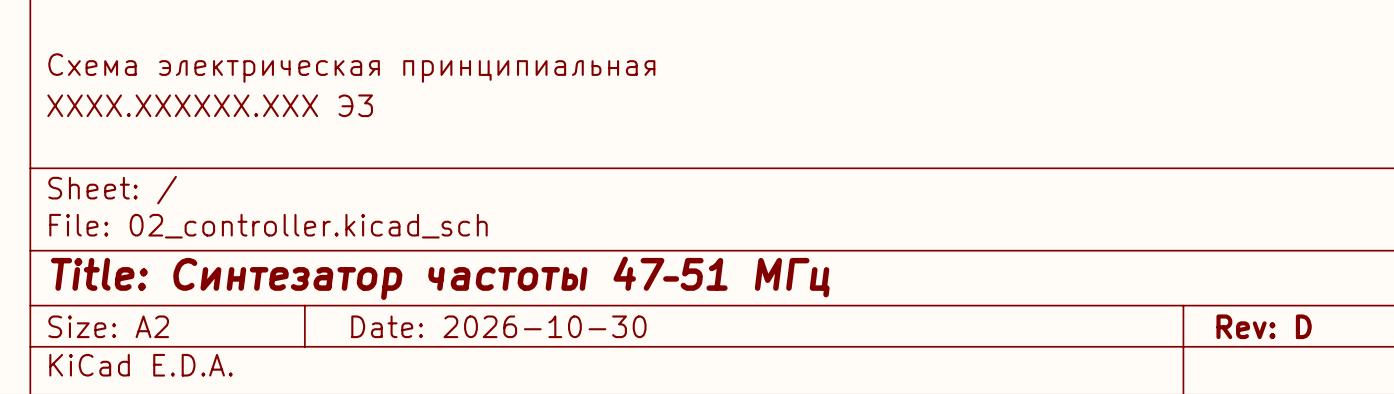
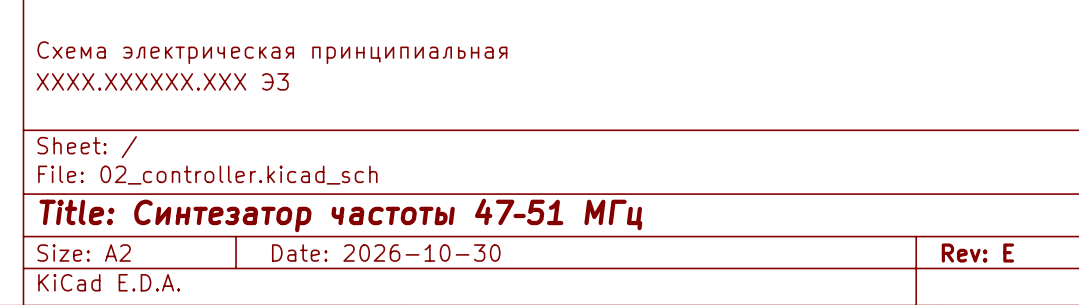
title block: Rev: D (1264, 326) -> Rev: E (977, 253)

